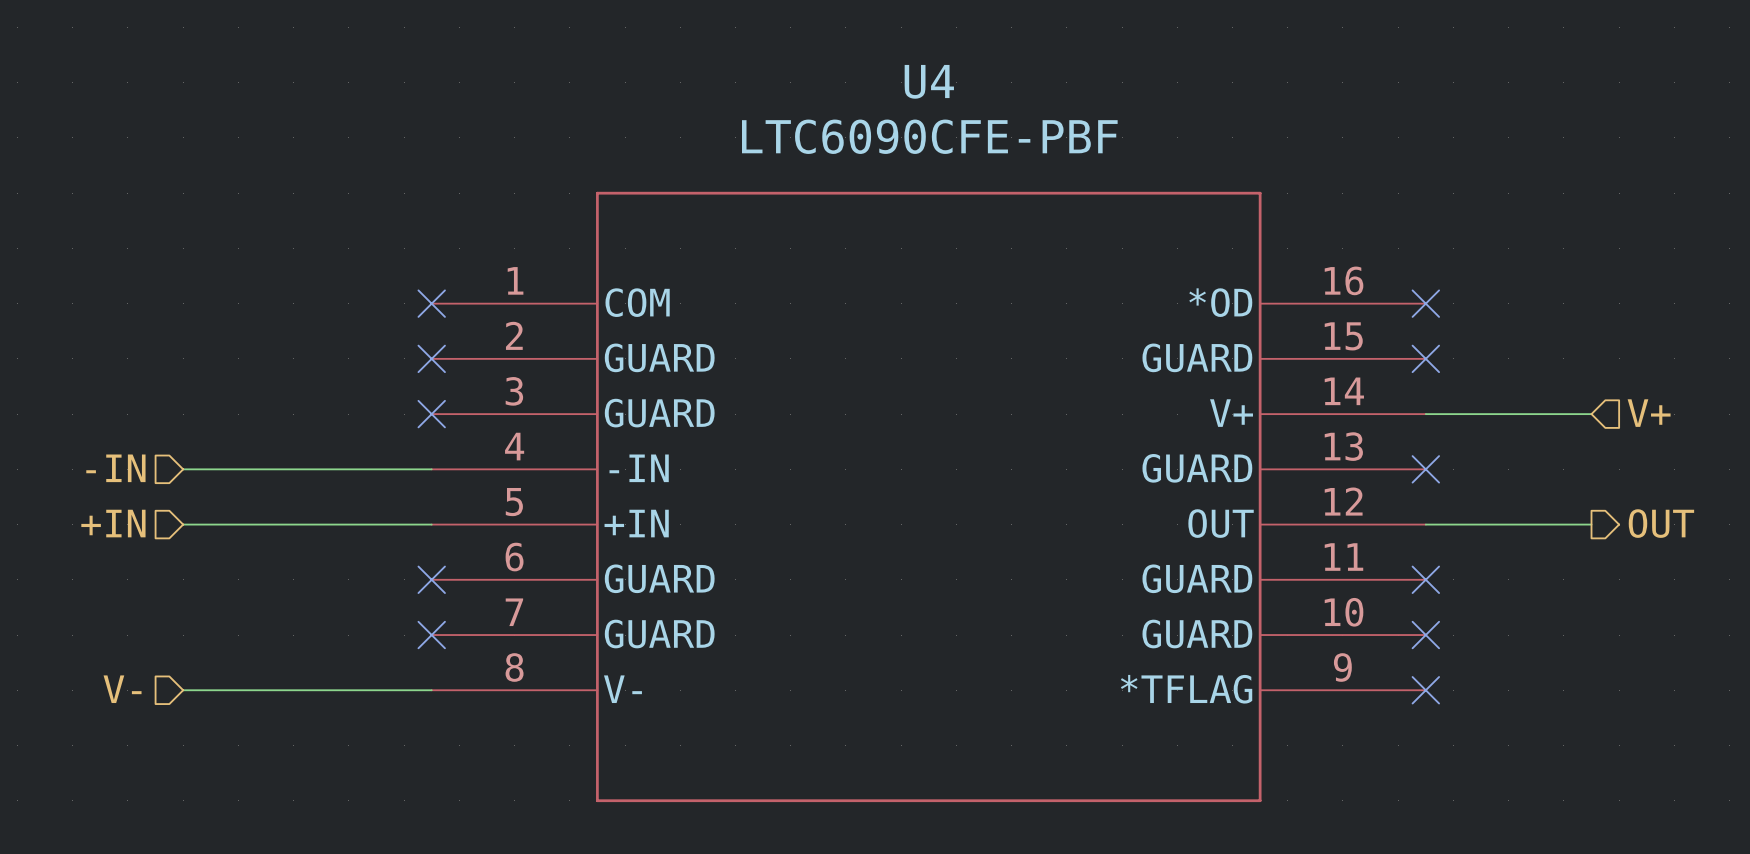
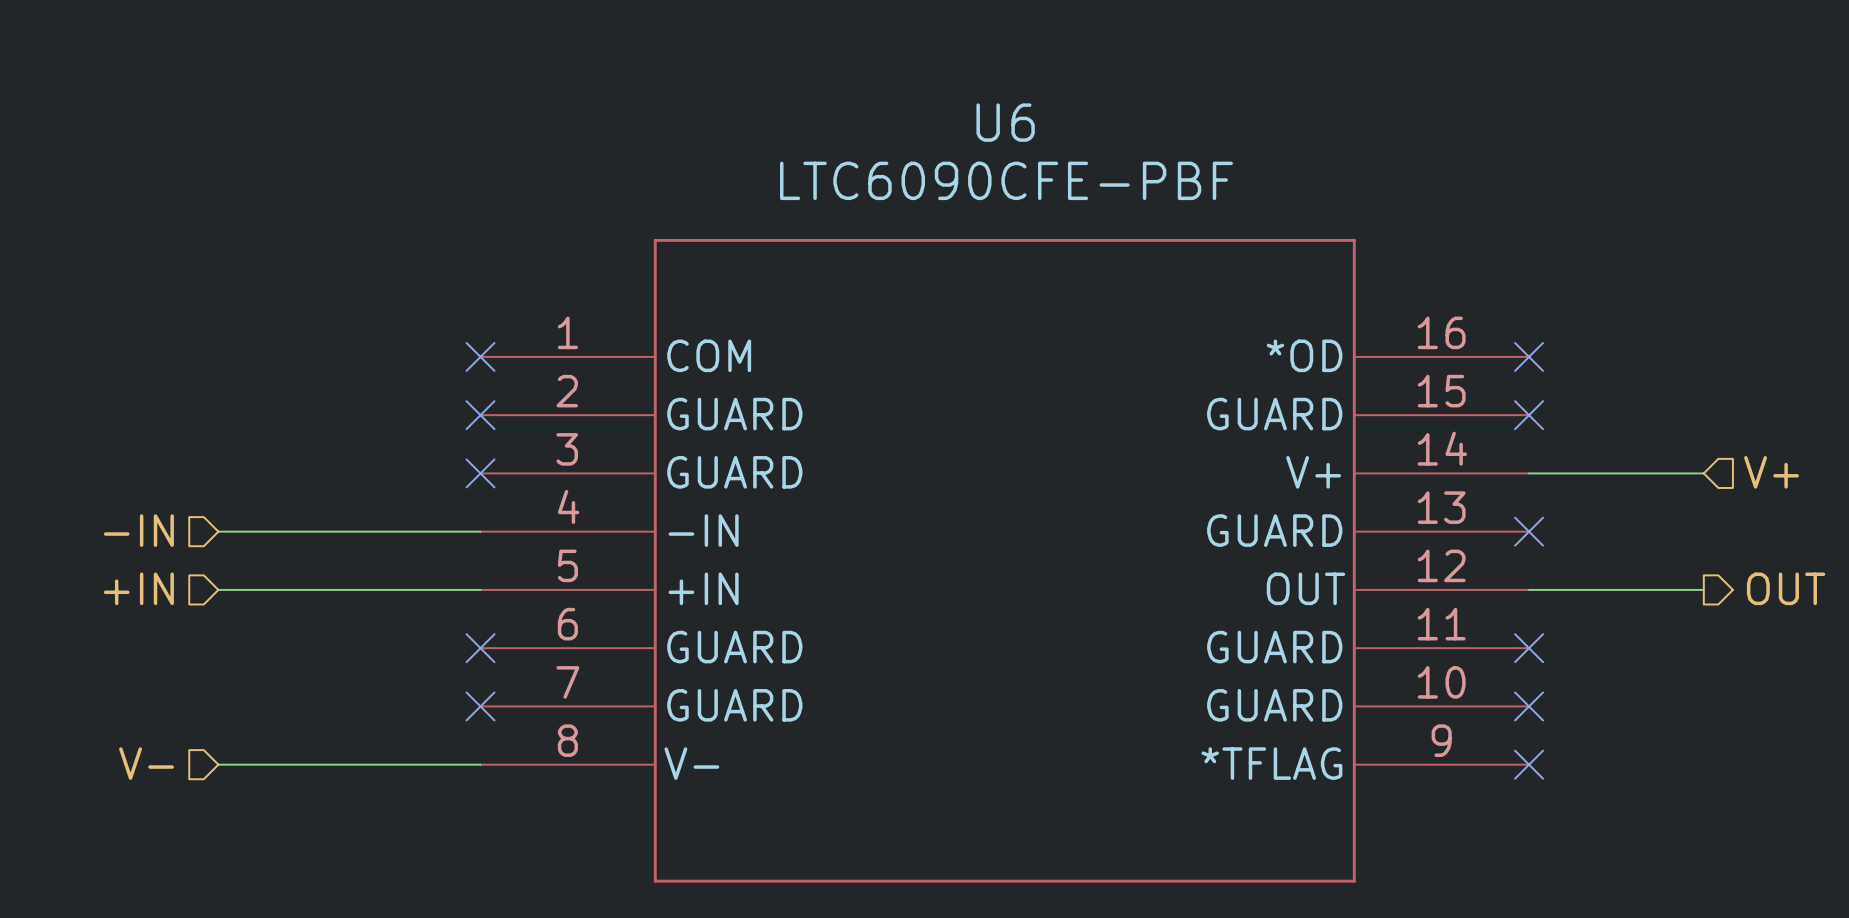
U4 name: U4 (929, 81) -> U6 (1005, 122)

